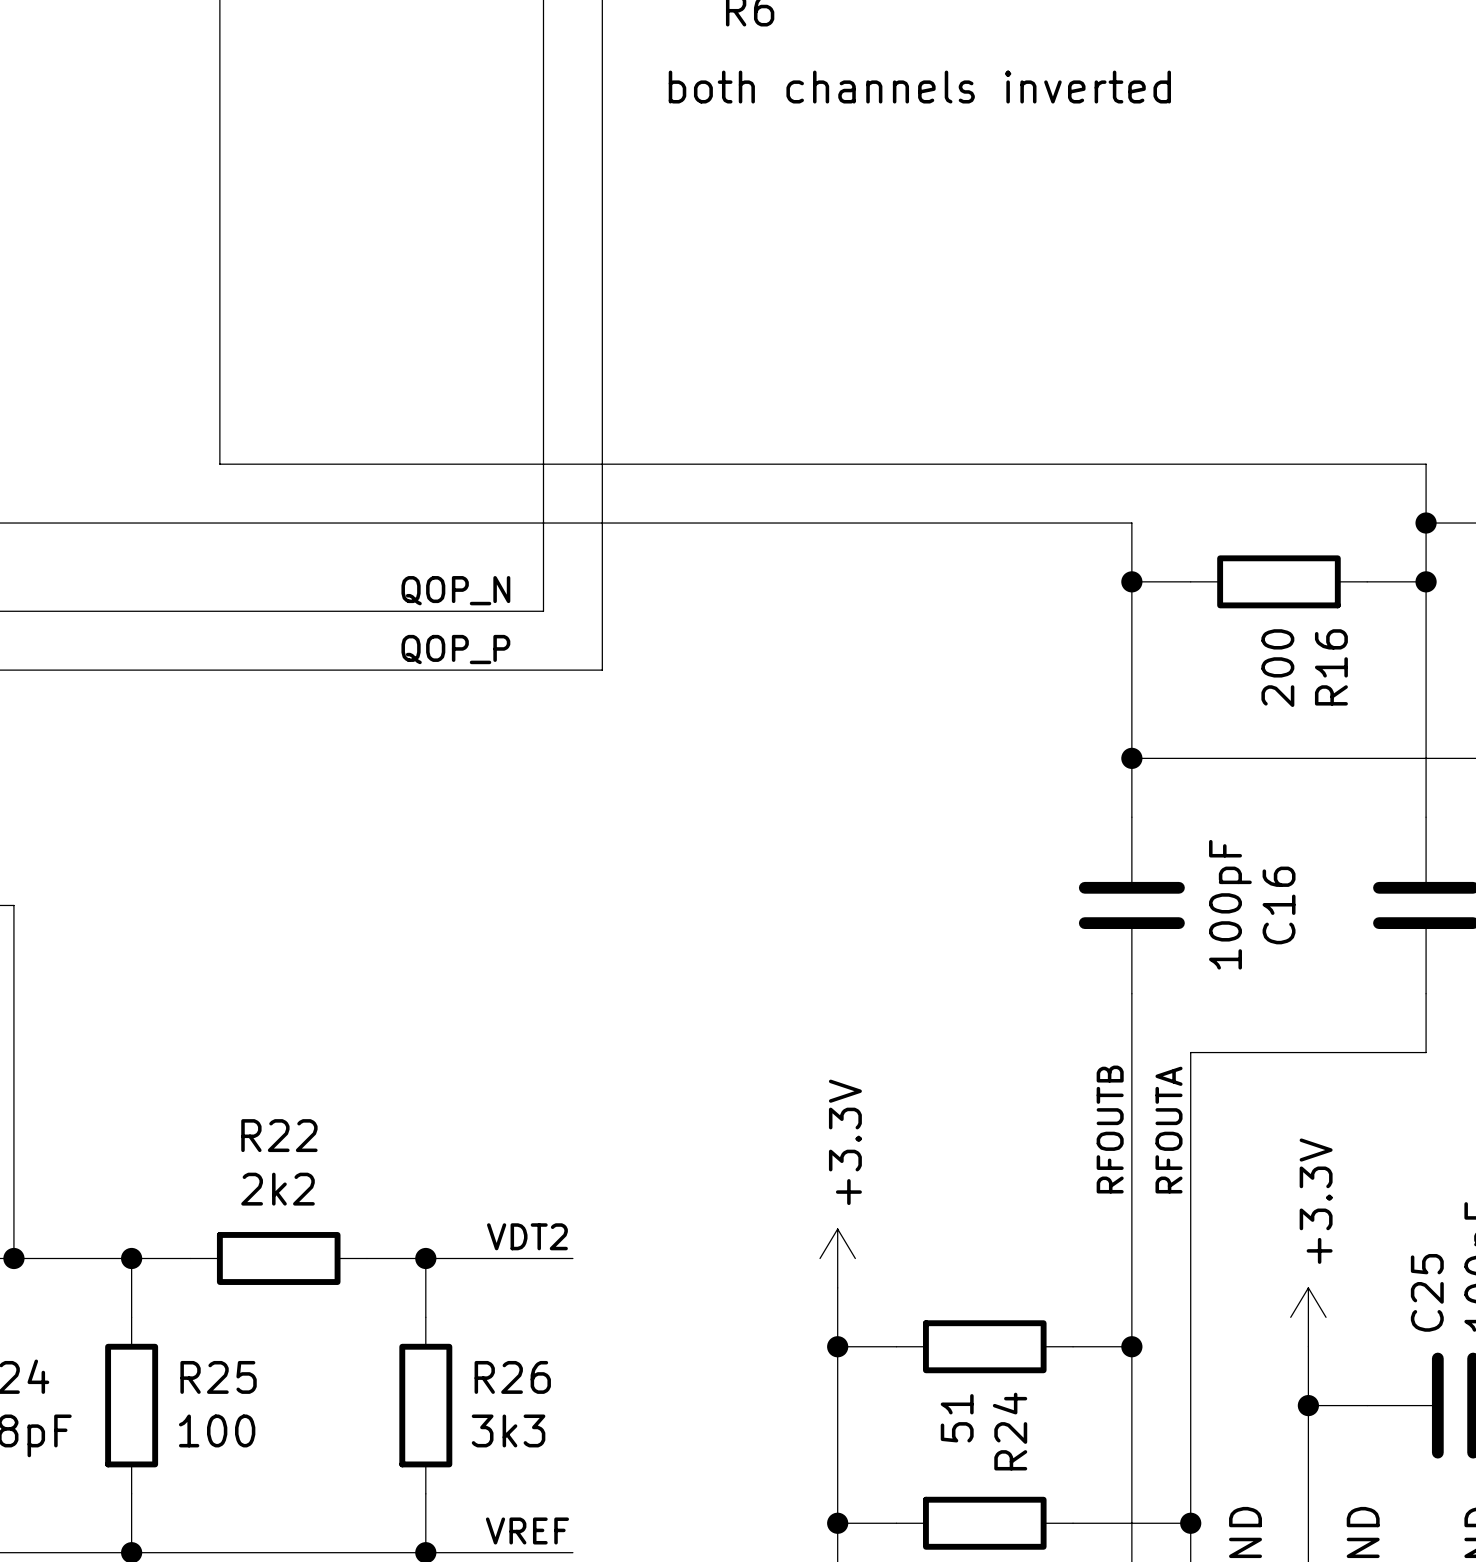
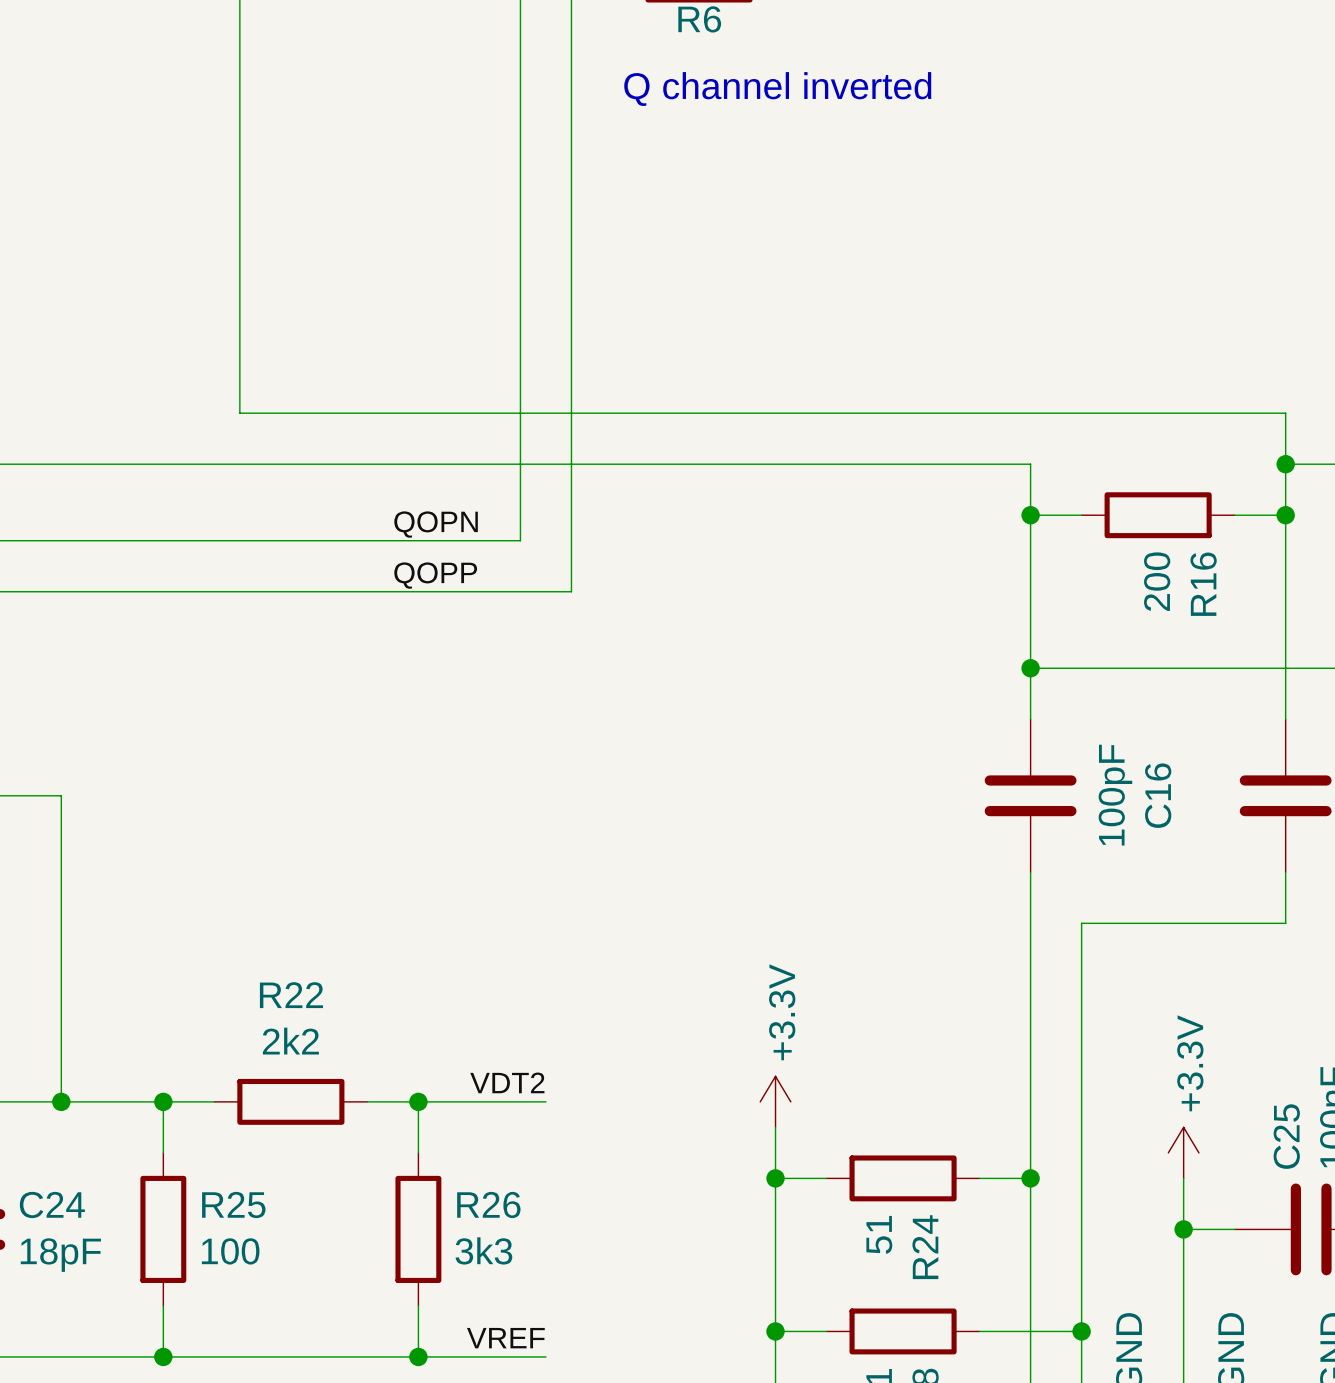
text: both channels inverted (919, 87) -> Q channel inverted (777, 89)
label: QOP_N (455, 590) -> QOPN (436, 524)
label: QOP_P (455, 649) -> QOPP (435, 575)
label: RFOUTB (1110, 1129) -> none
label: RFOUTA (1169, 1130) -> none

